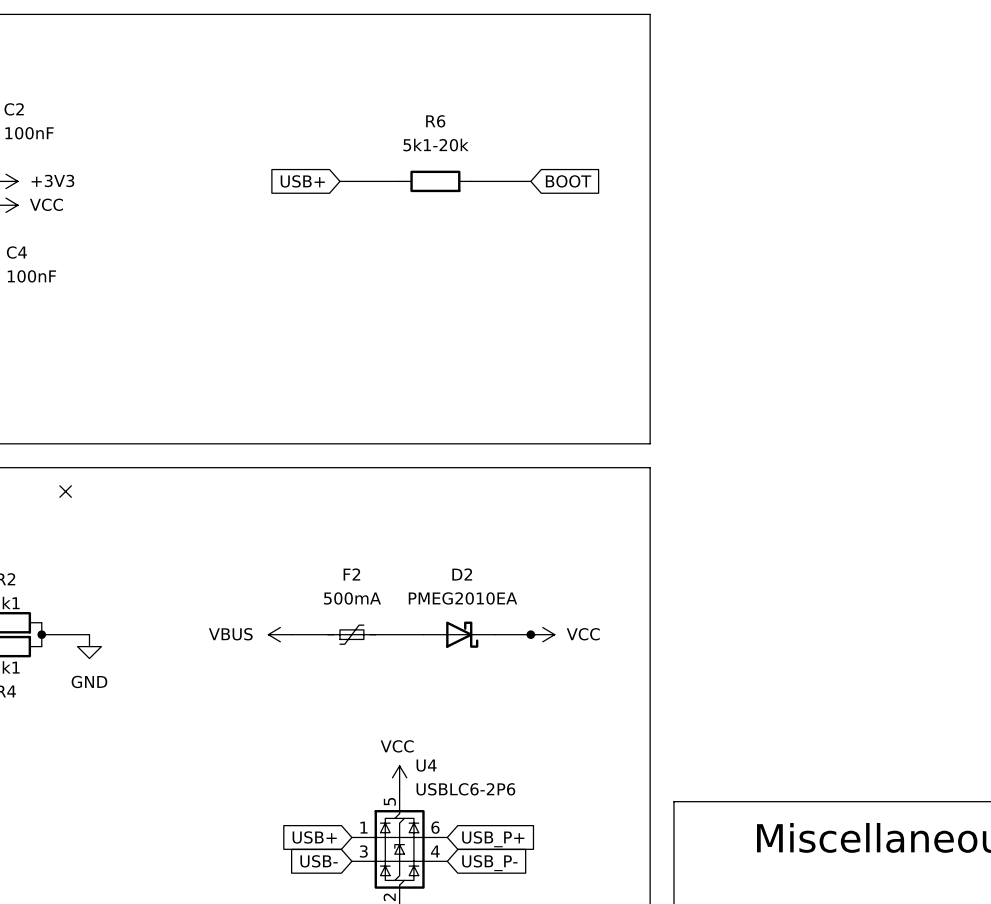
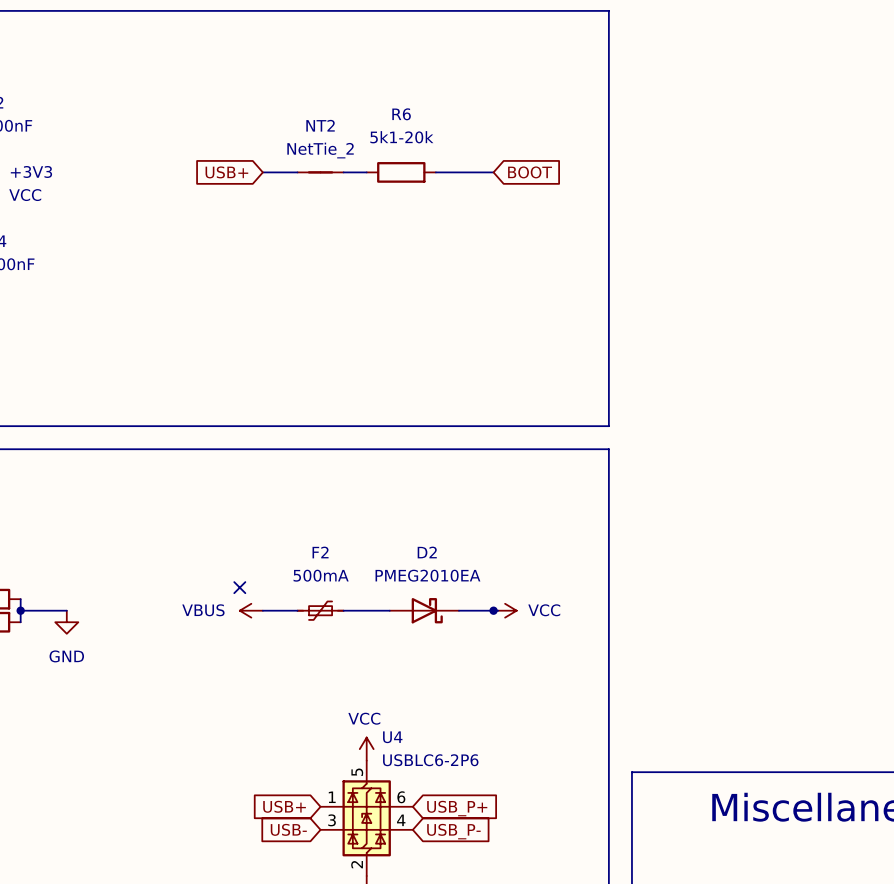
global label position: USB+ (302, 181) -> USB+ (226, 172)
NT2: none -> NetTie_2 (320, 172)
no-connect mark: (65, 491) -> none
no-connect mark: none -> (239, 587)

